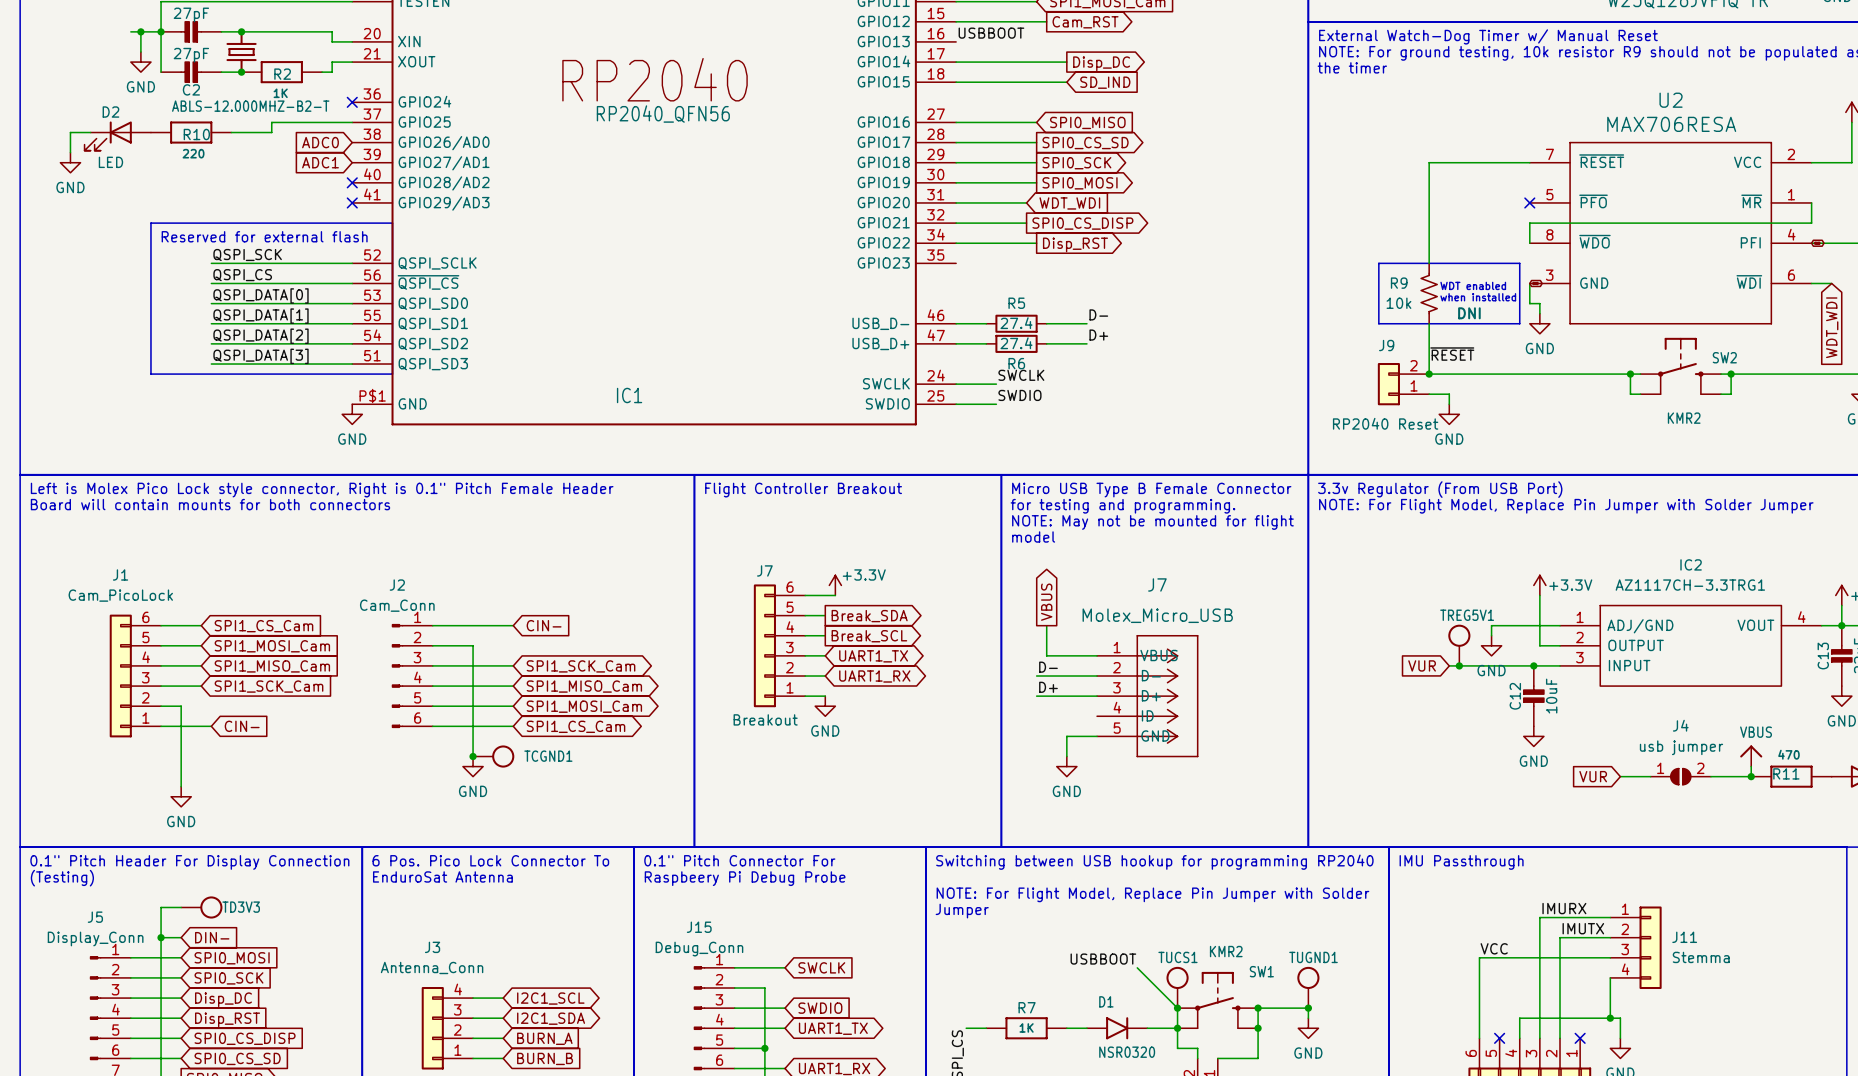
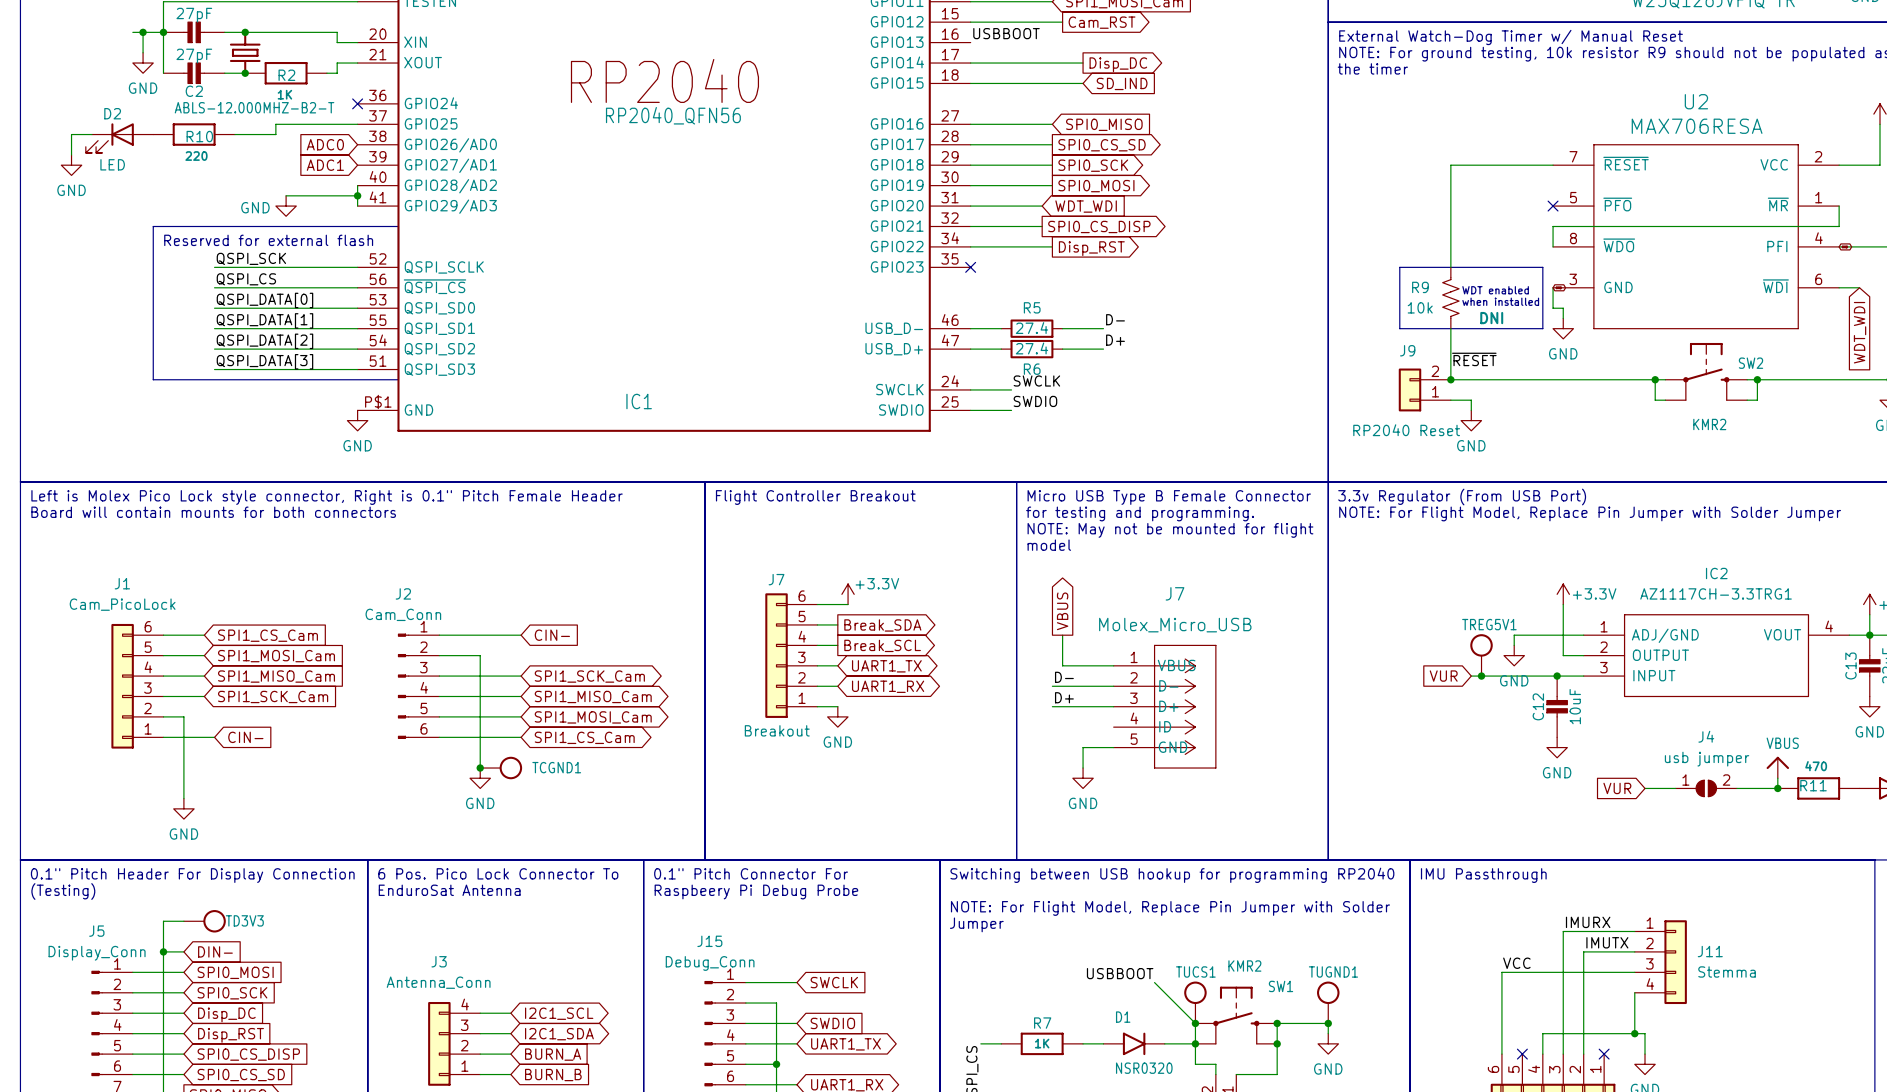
wire: none -> (357, 185) (357, 206)
no-connect mark: (352, 182) -> none
wire: none -> (286, 195) (357, 195)
junction: none -> (357, 195)
power symbol: none -> GND (286, 206)
no-connect mark: (352, 202) -> none
no-connect mark: none -> (970, 267)

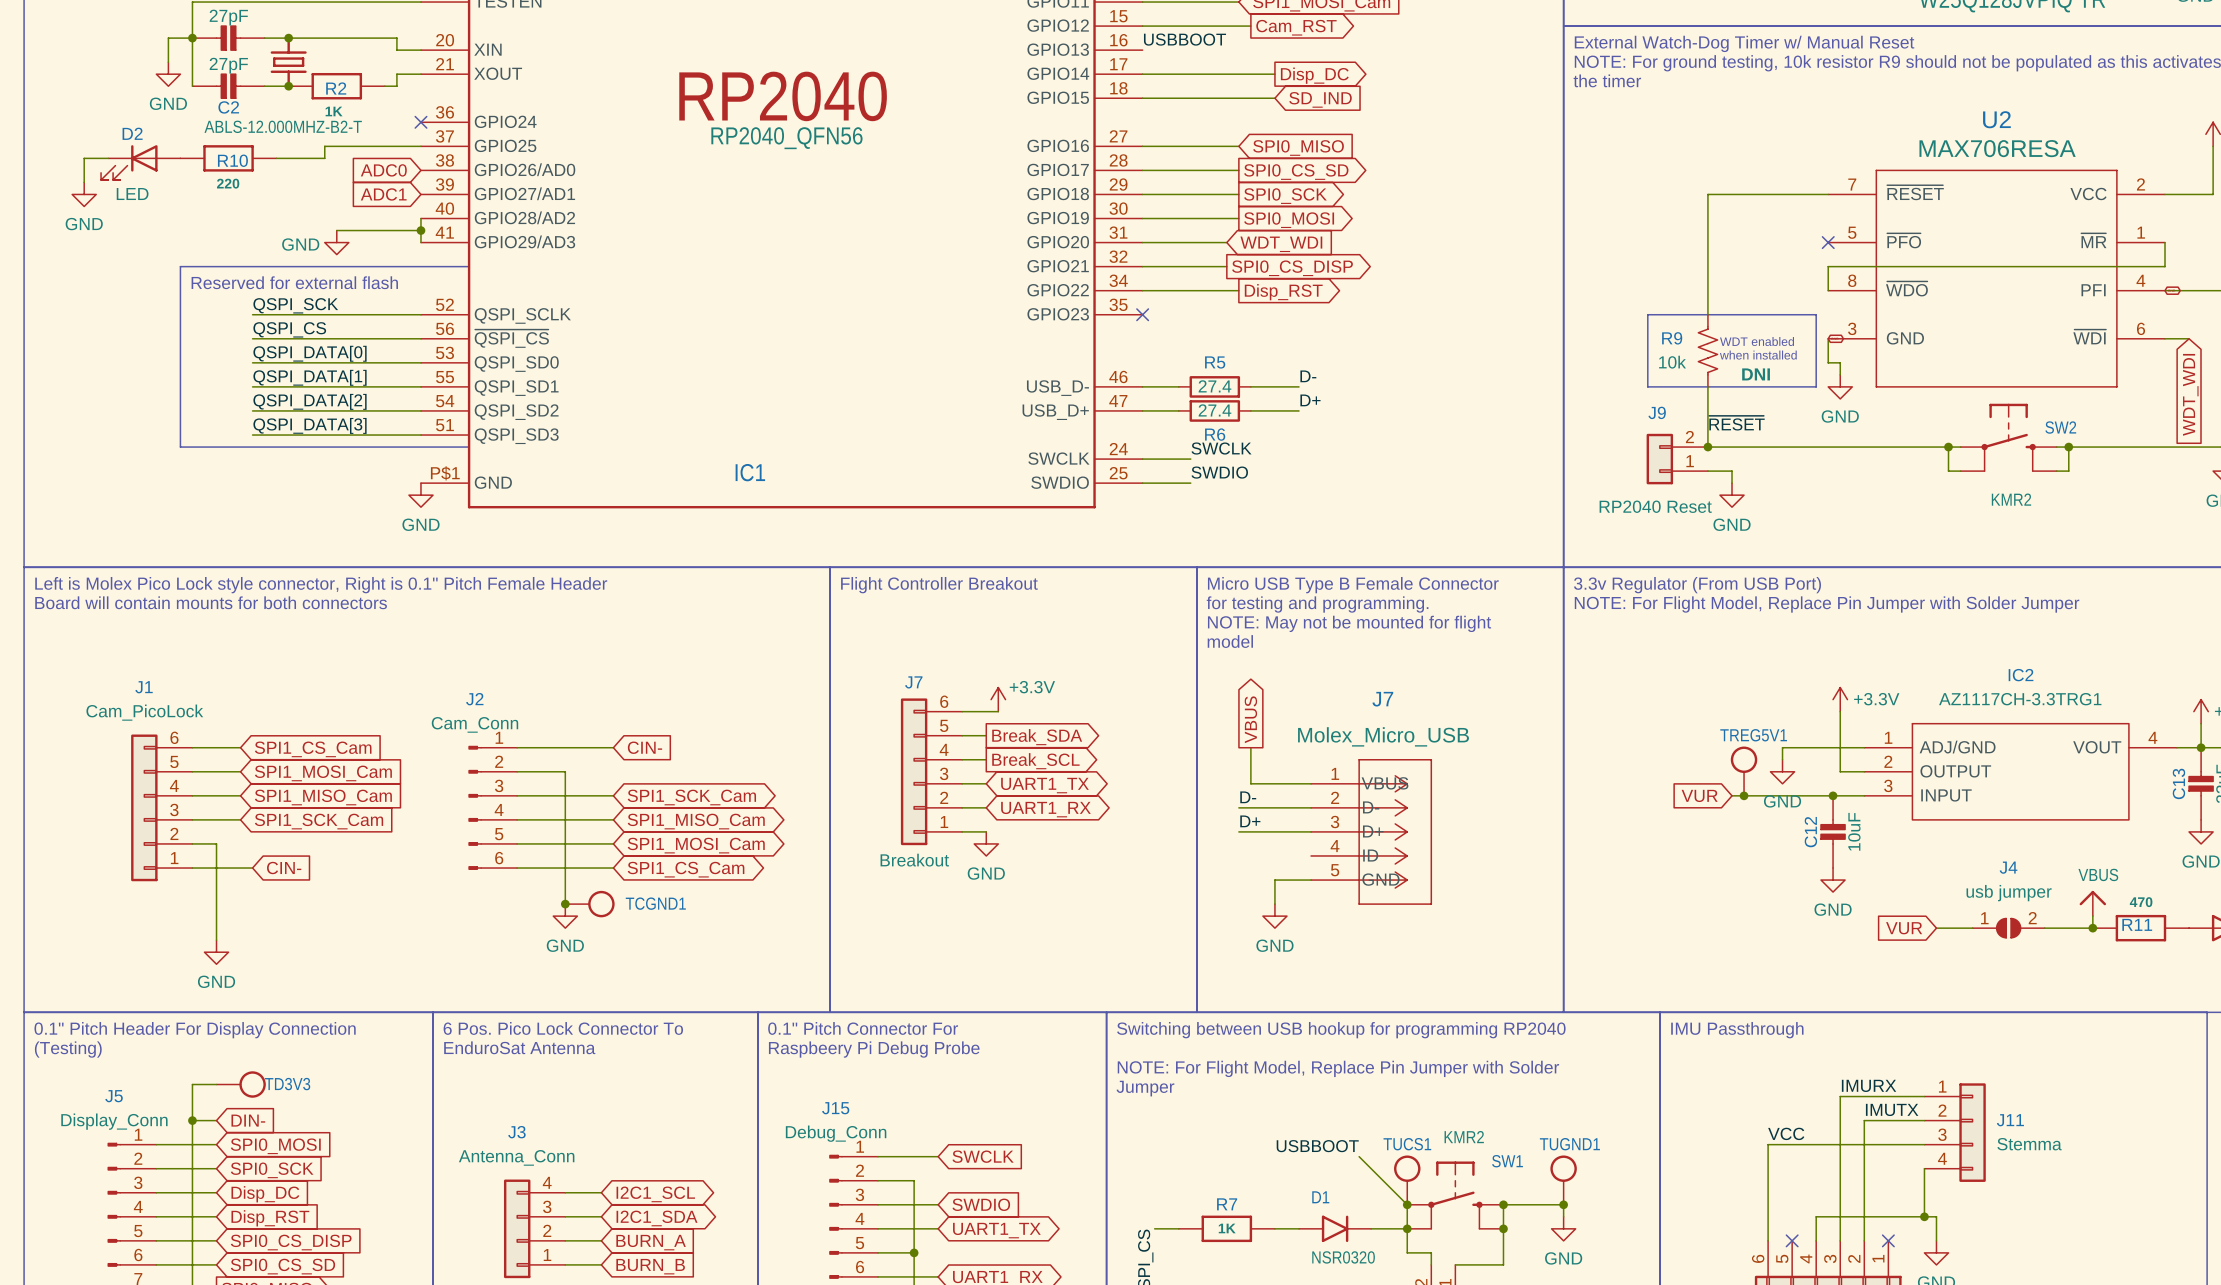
wire: (132, 32) (143, 32) -> none
junction: (143, 32) -> none

